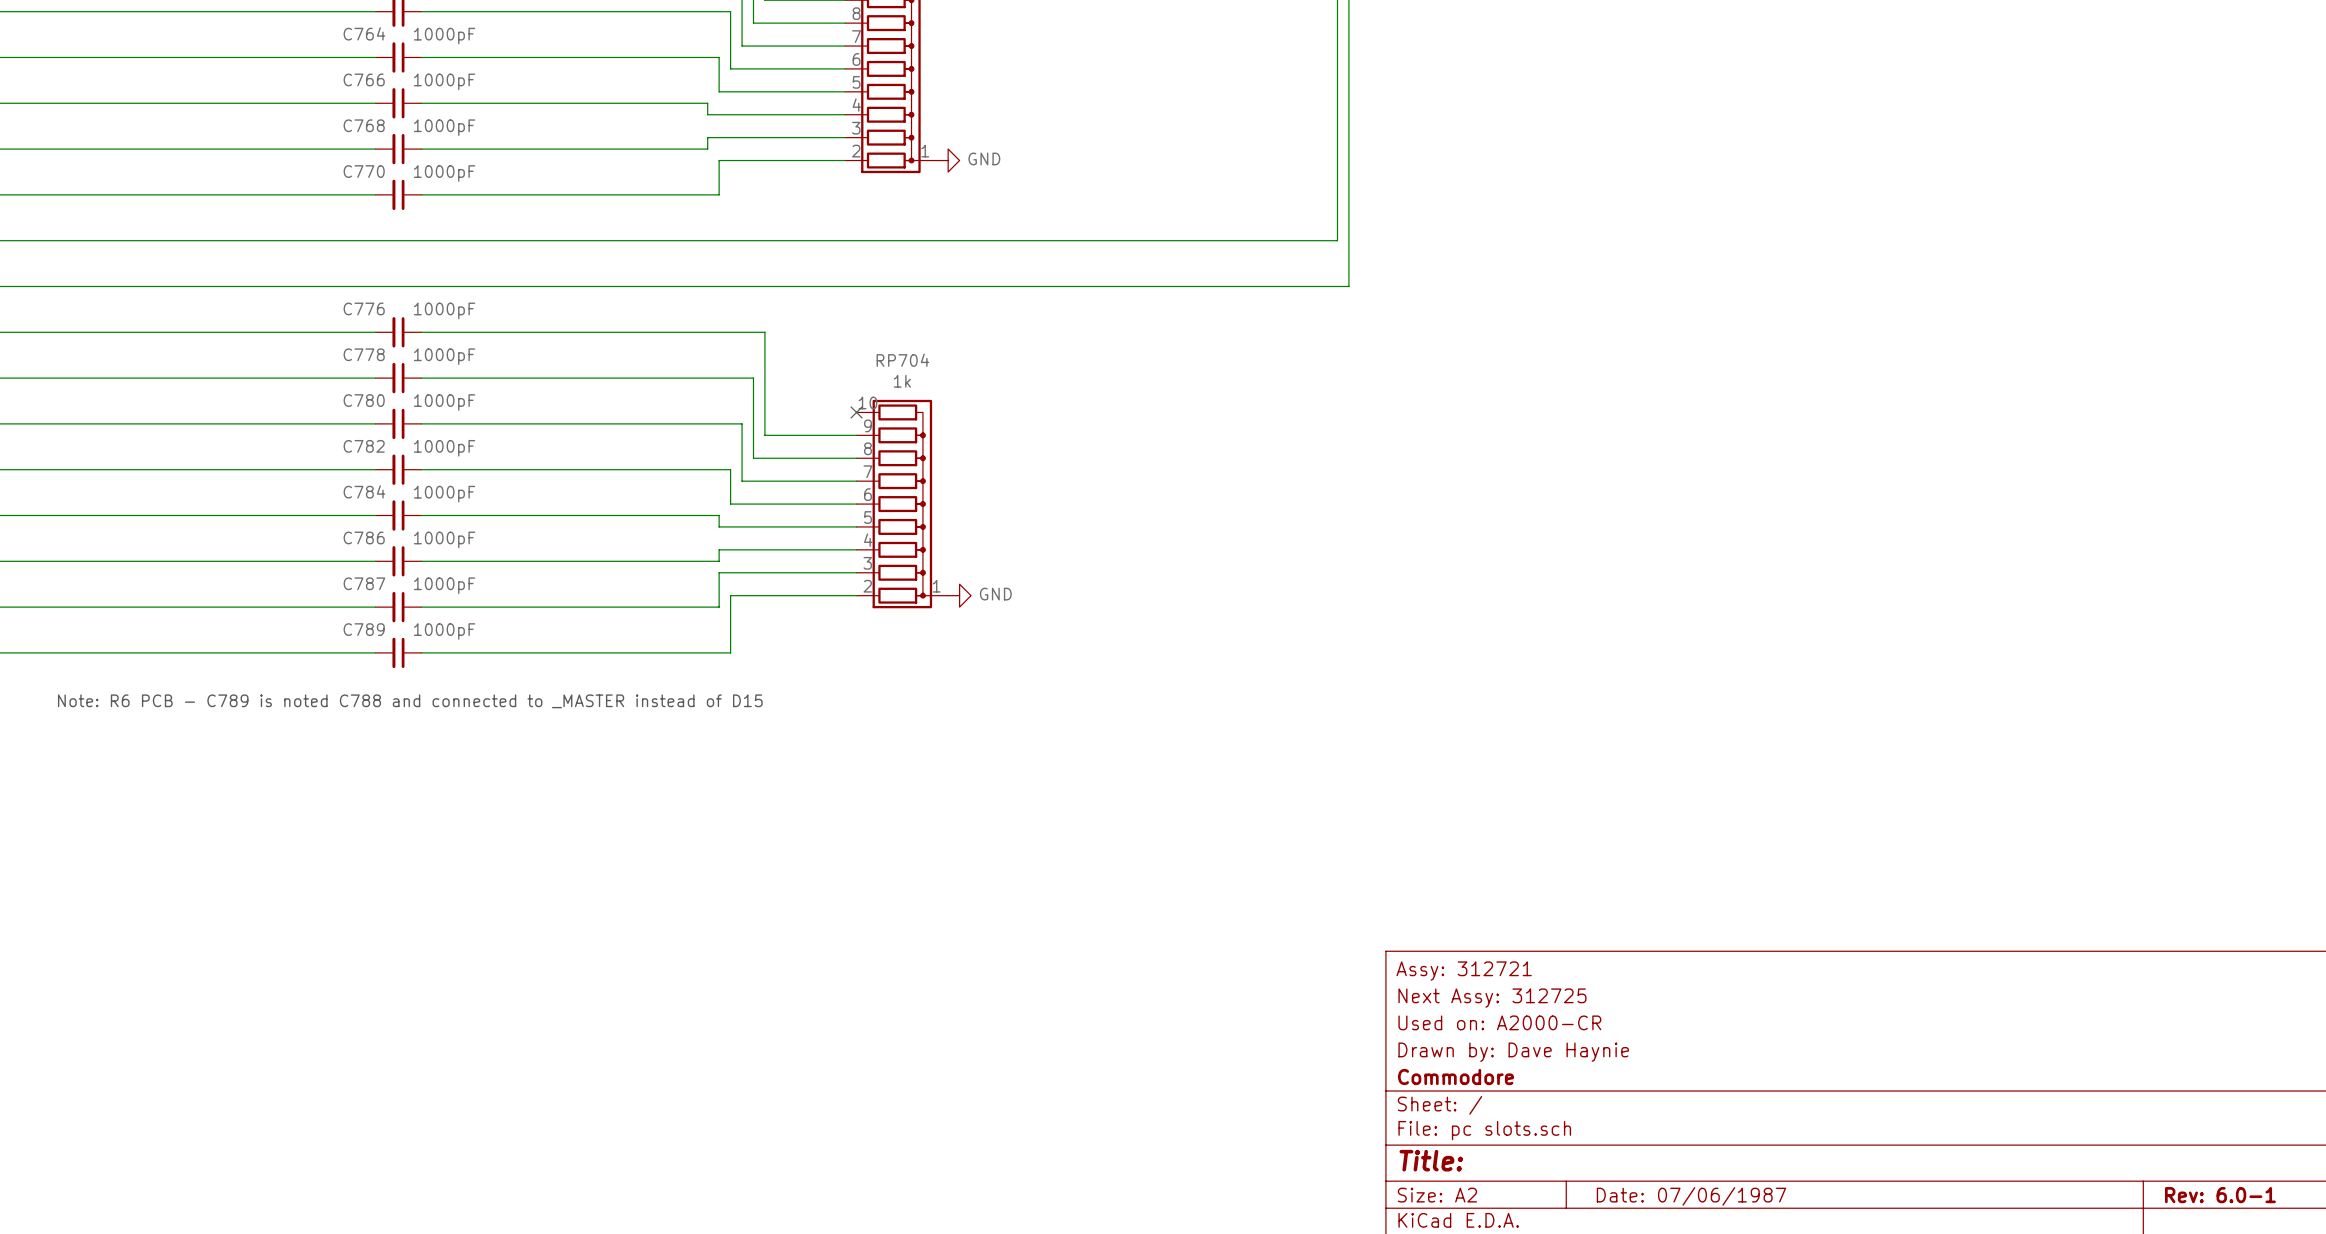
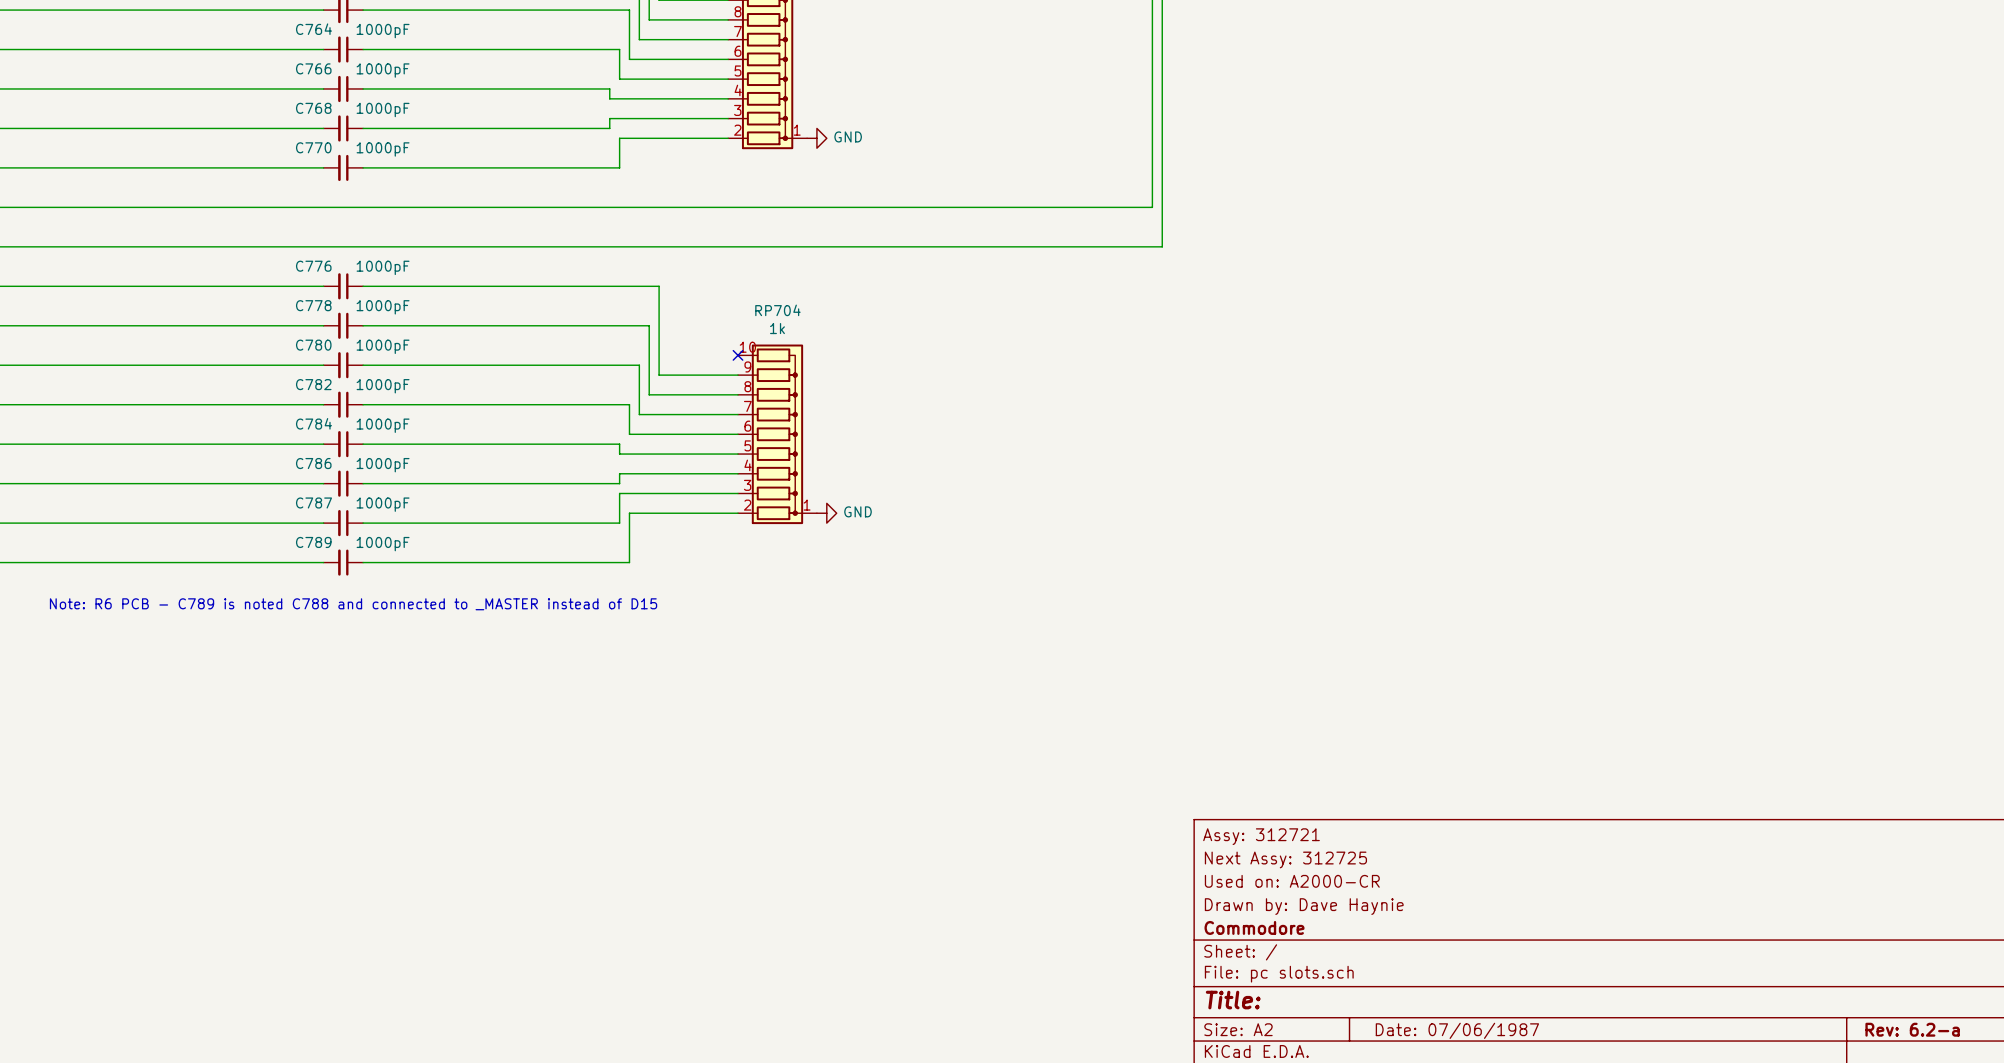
title block: Rev: 6.0-1 (2220, 1195) -> Rev: 6.2-a (1912, 1029)

